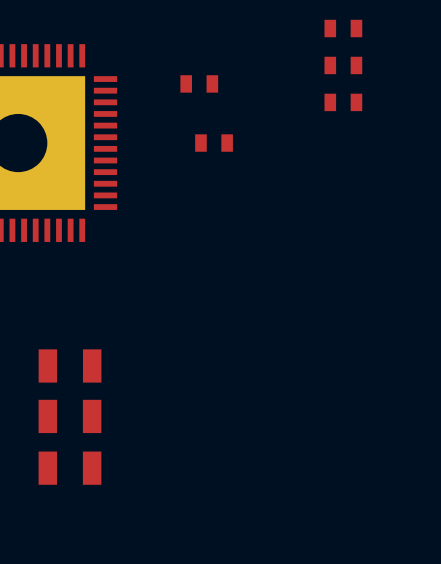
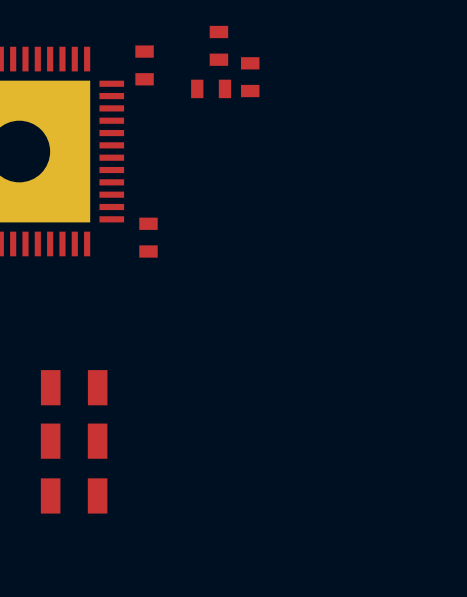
part: (343, 28) -> none
part: none -> (218, 45)
part: none -> (144, 65)
part: (343, 65) -> none
part: none -> (250, 77)
part: (343, 102) -> none
part: (214, 143) -> none
part: none -> (148, 237)

